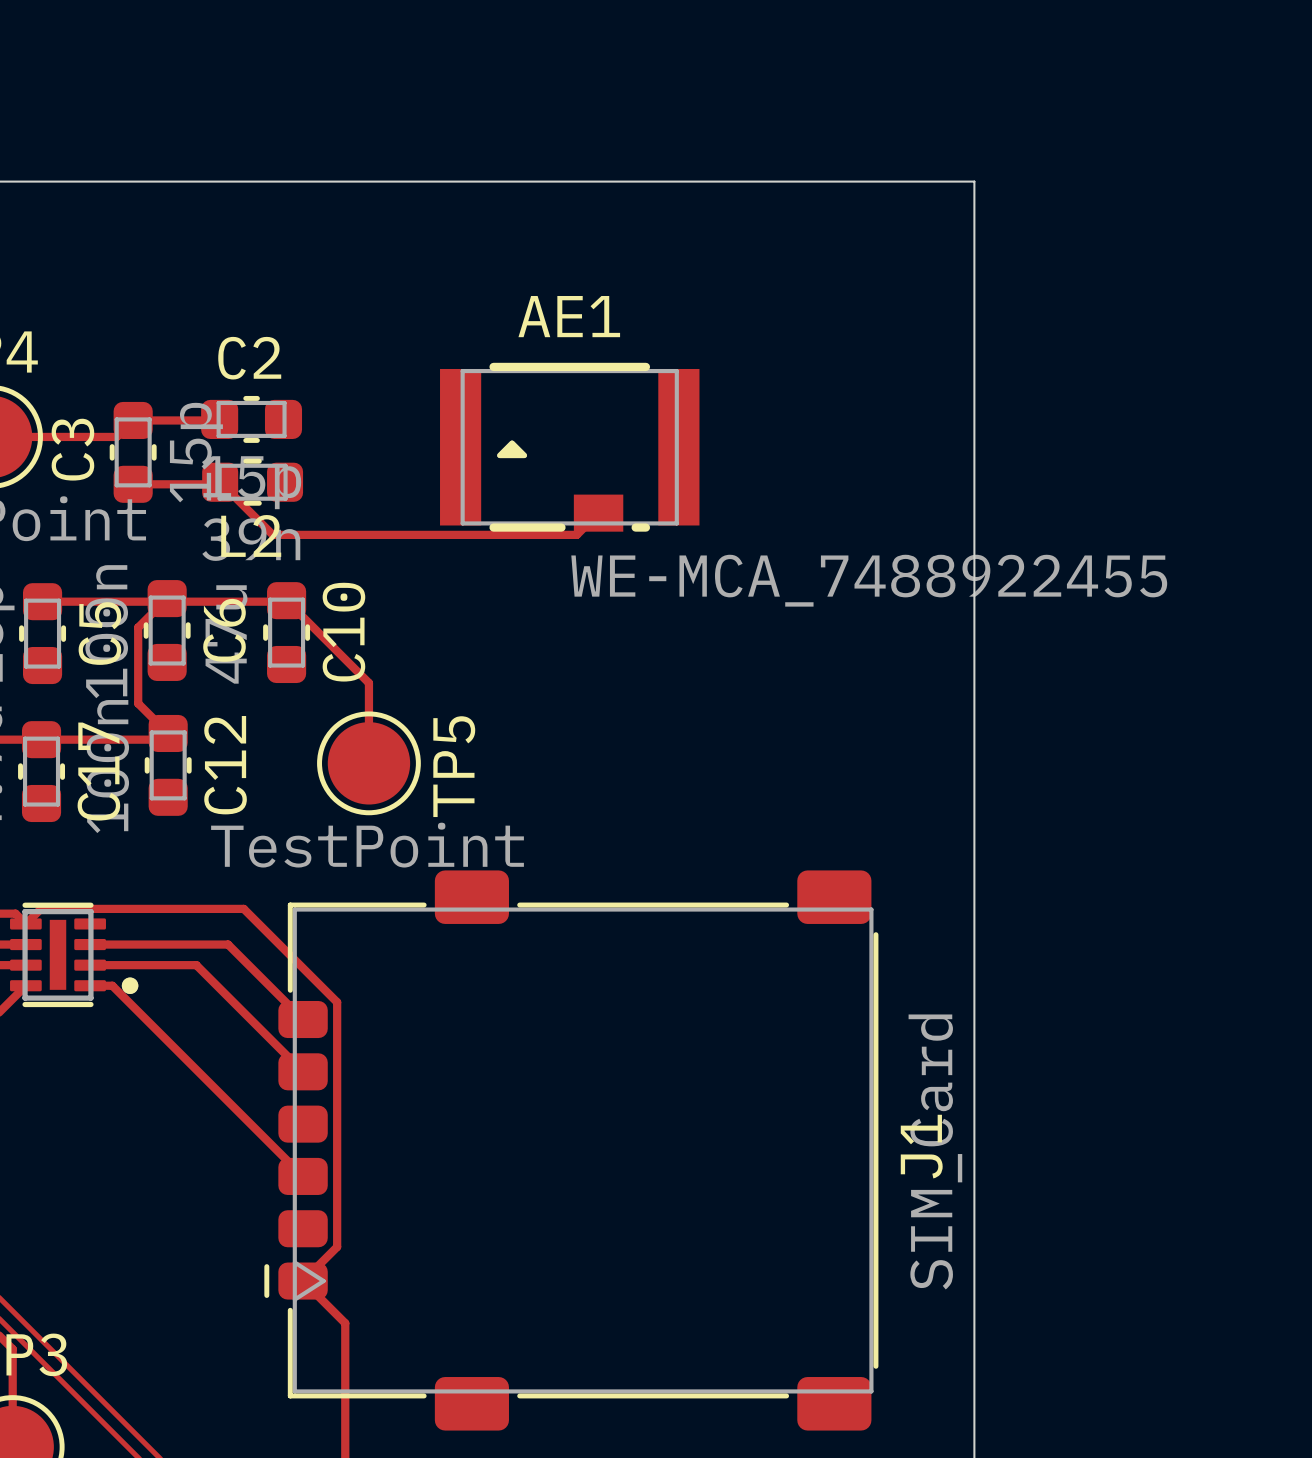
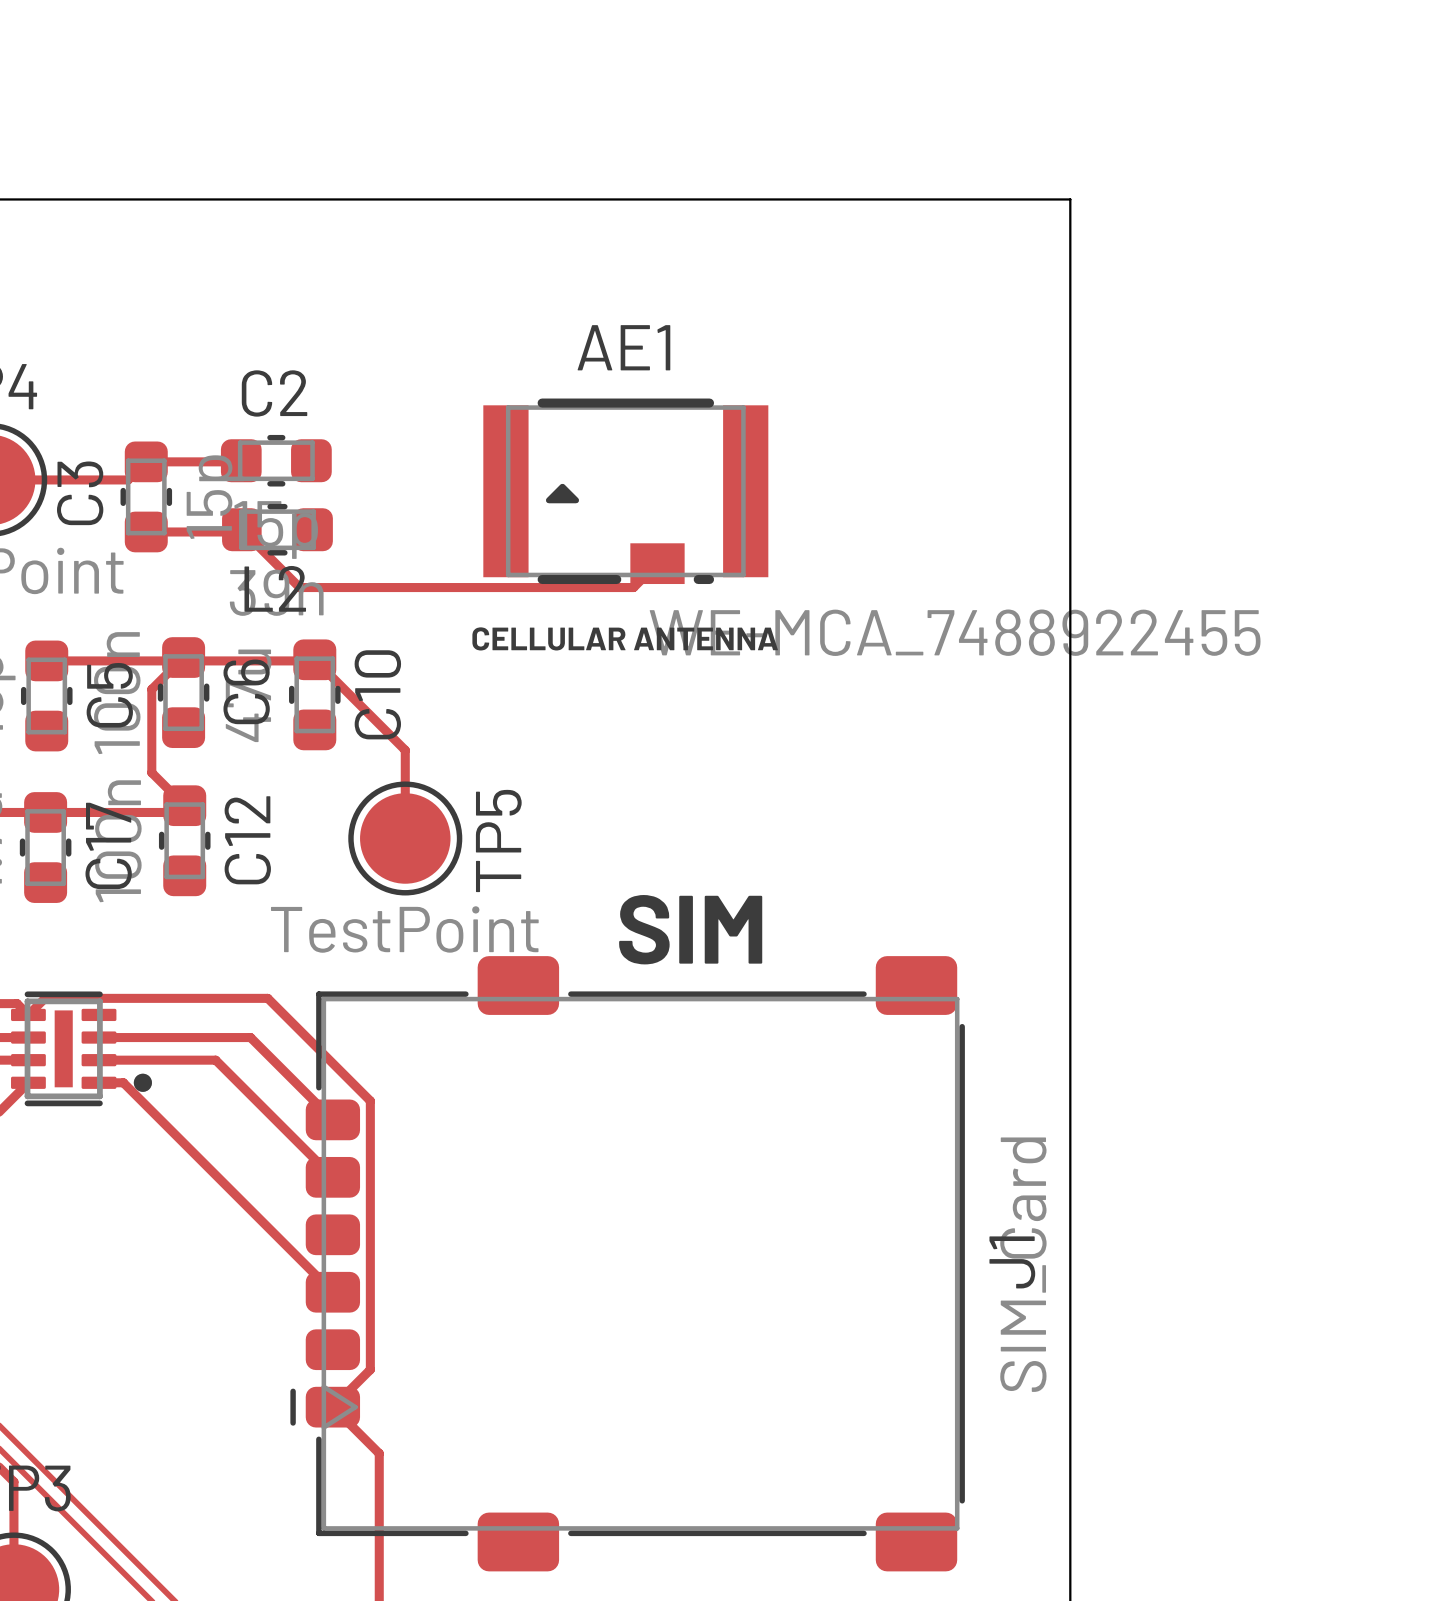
text: none -> CELLULAR ANTENNA (625, 638)
text: none -> SIM (690, 929)

